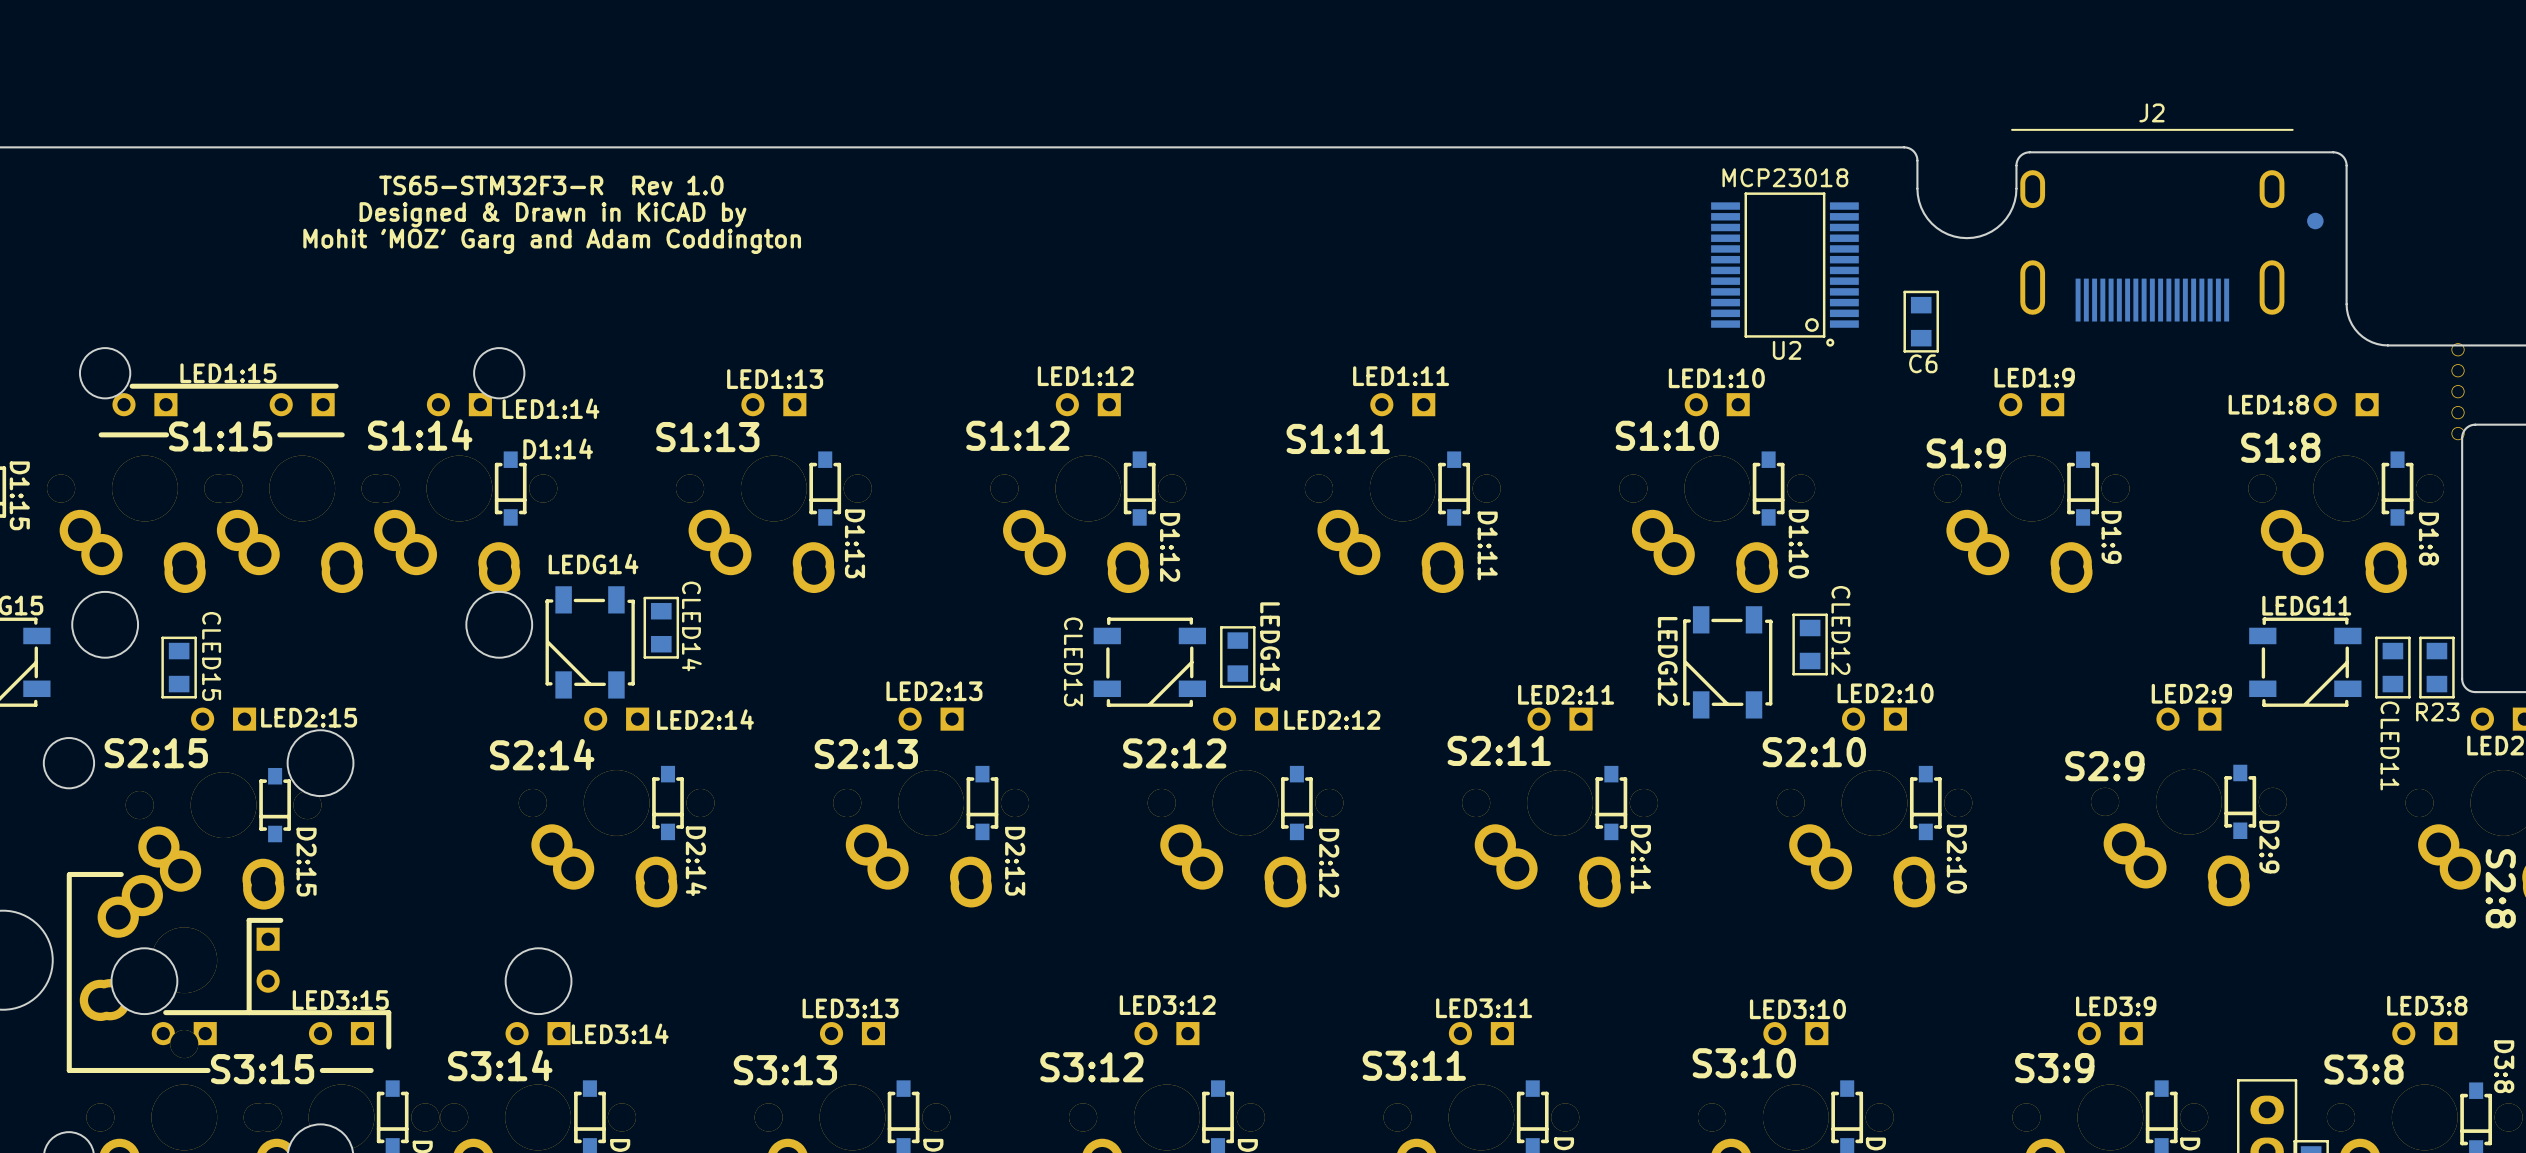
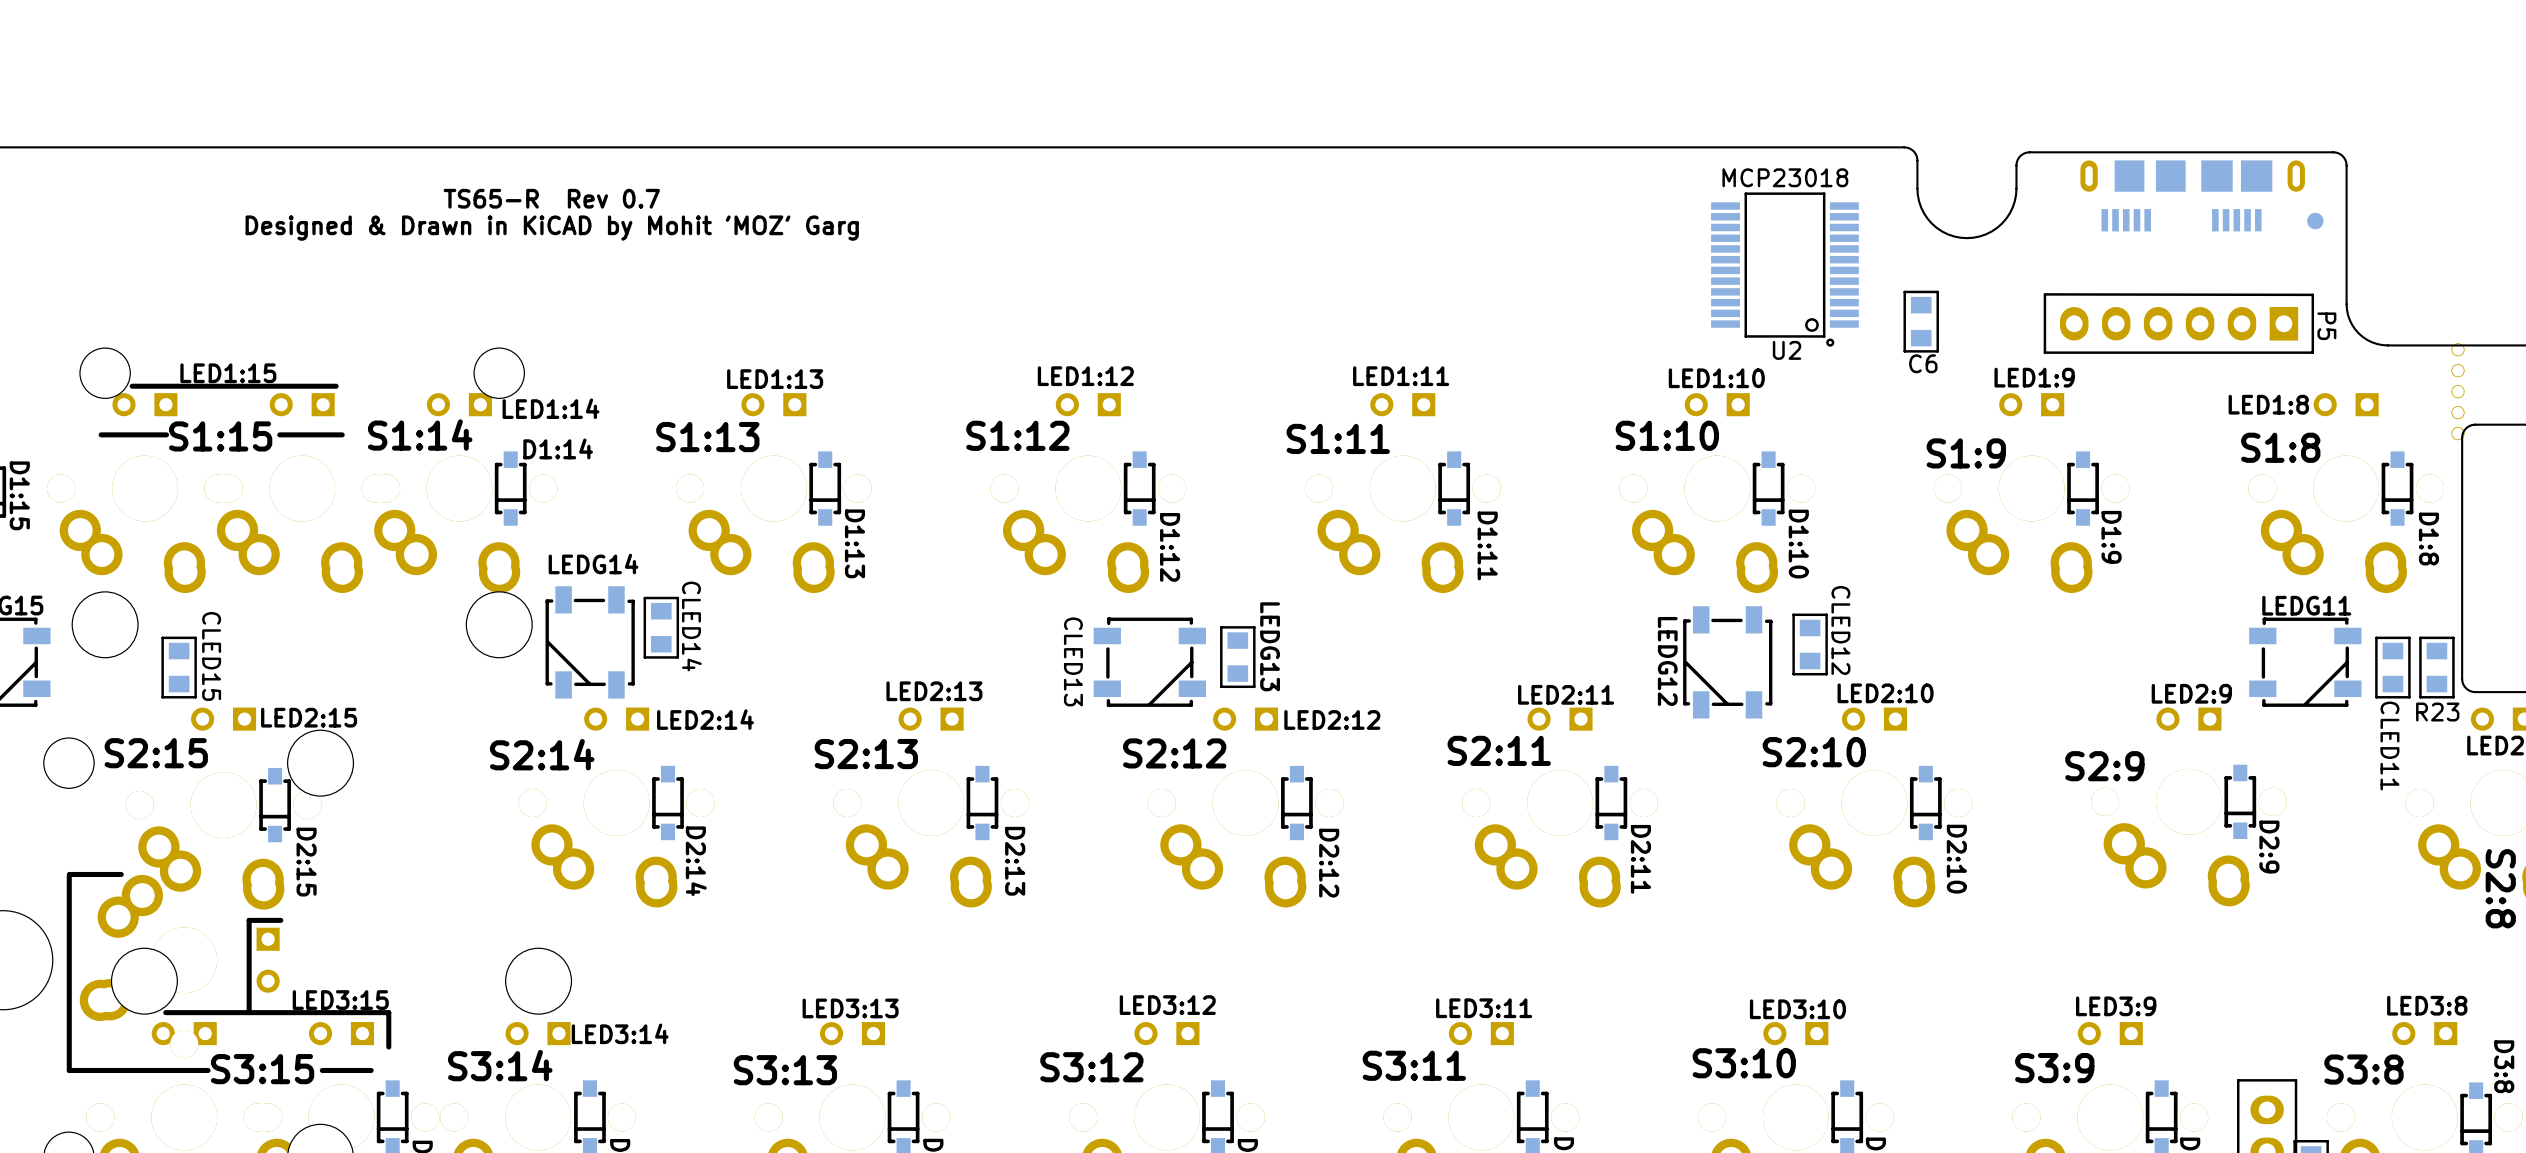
text: TS65-STM32F3-R Rev 1.0 (551, 185) -> TS65-R Rev 0.7 (551, 198)
part: none -> (2192, 195)
text: Designed & Drawn in KiCAD by (552, 214) -> Designed & Drawn in KiCAD by Mohit 'MOZ' Garg (552, 228)
J2: (2152, 225) -> none
text: Mohit 'MOZ' Garg and Adam Coddington (552, 241) -> none
P5: none -> (2178, 323)

